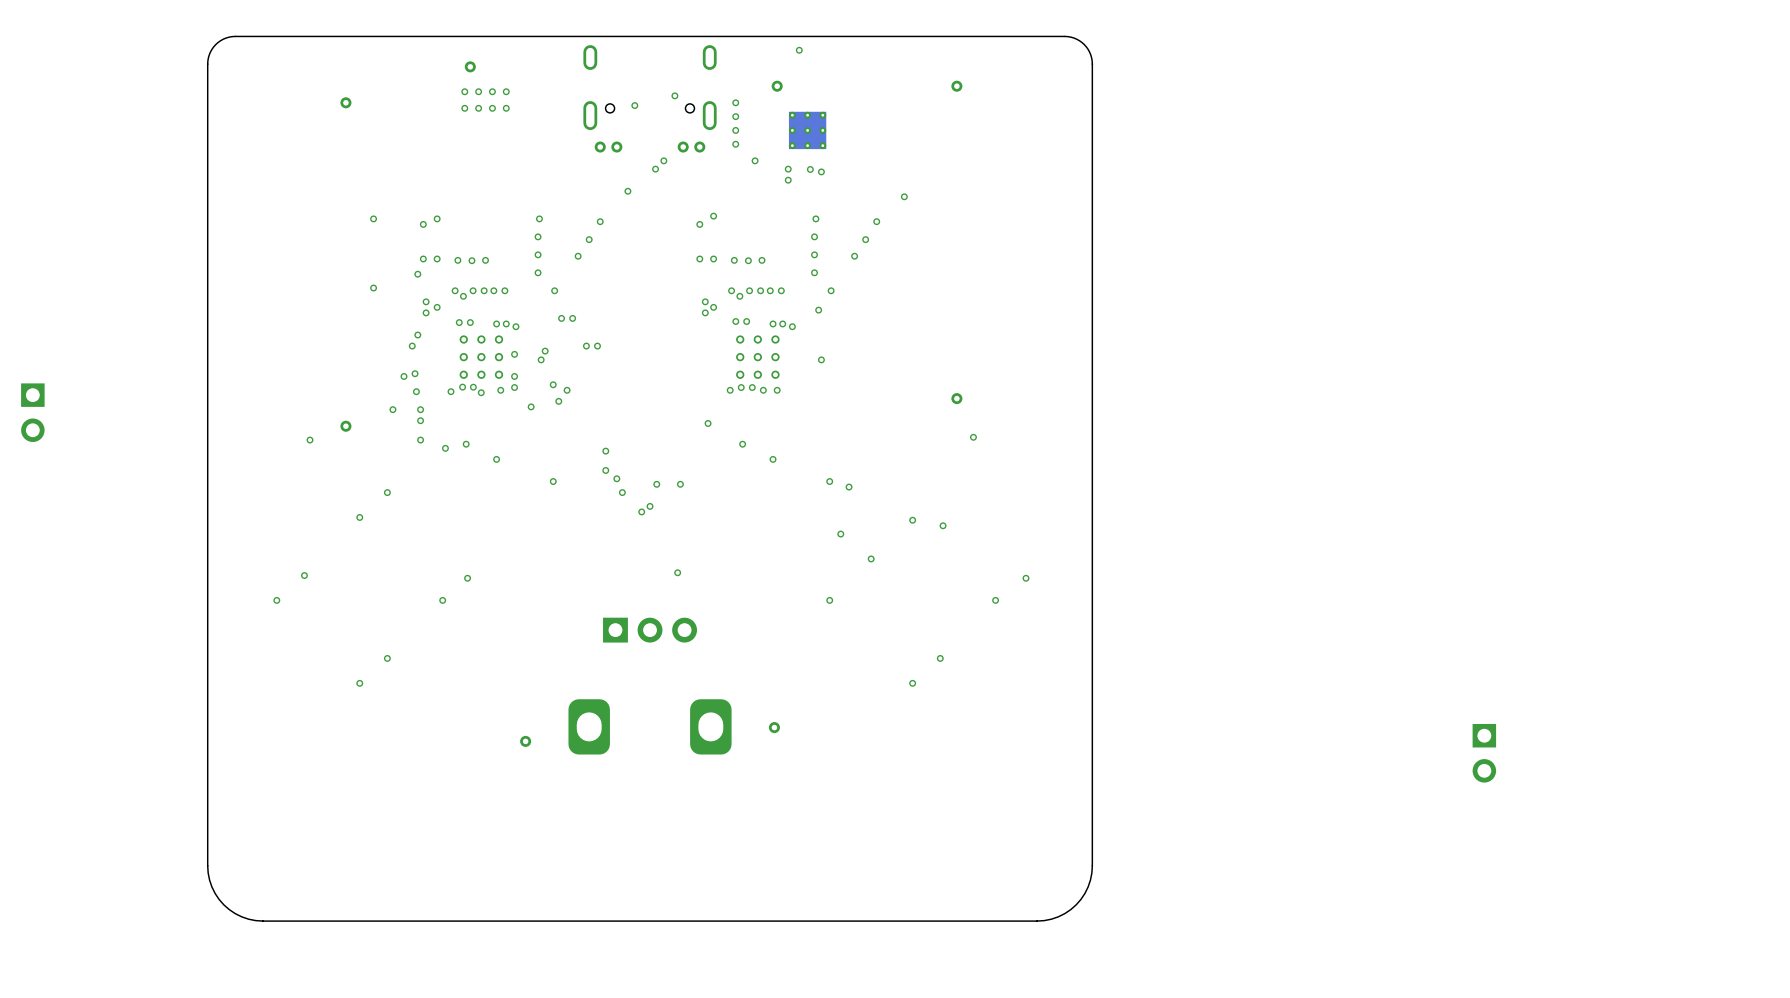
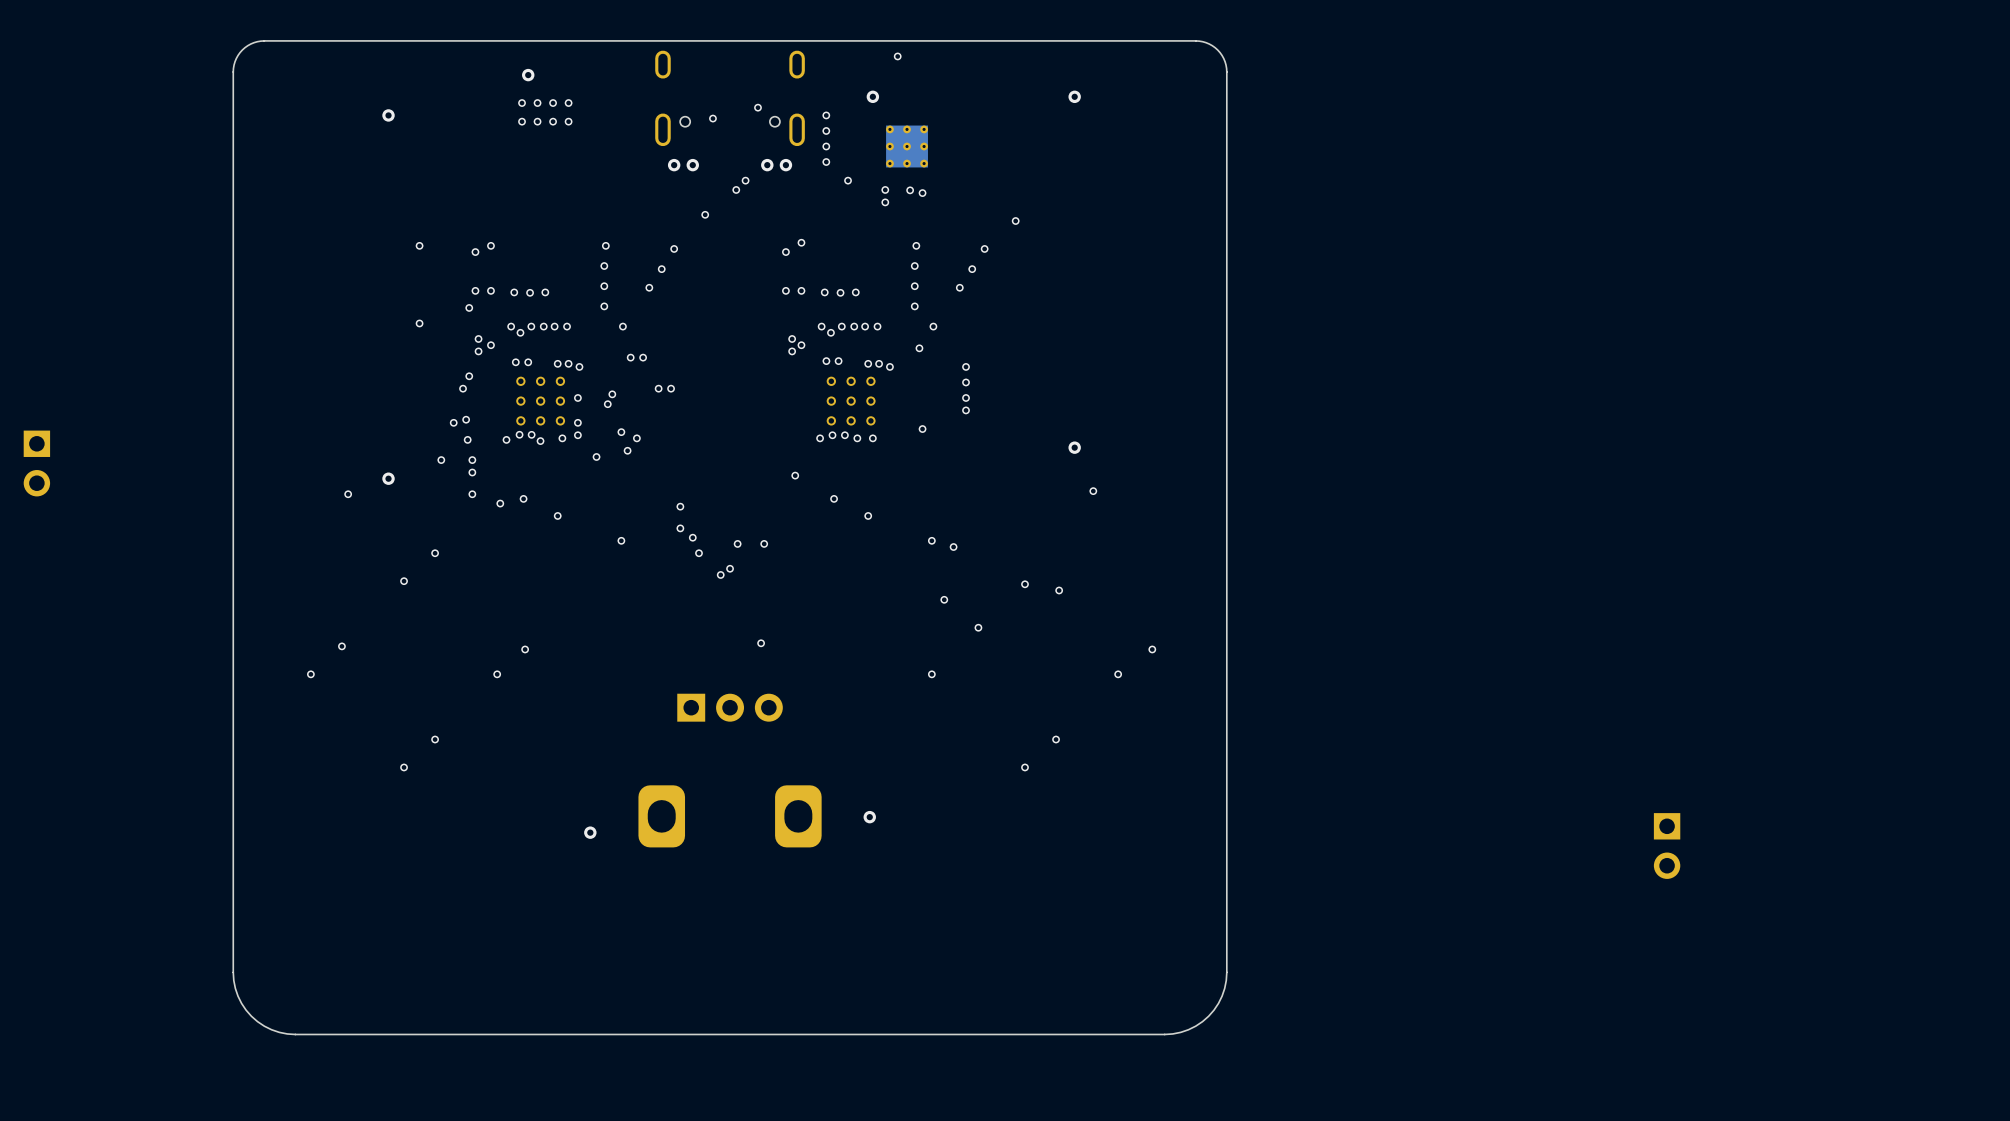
via: none -> (966, 366)
via: none -> (966, 382)
via: none -> (966, 397)
via: (821, 359) -> none
via: none -> (966, 410)
via: none -> (922, 429)

